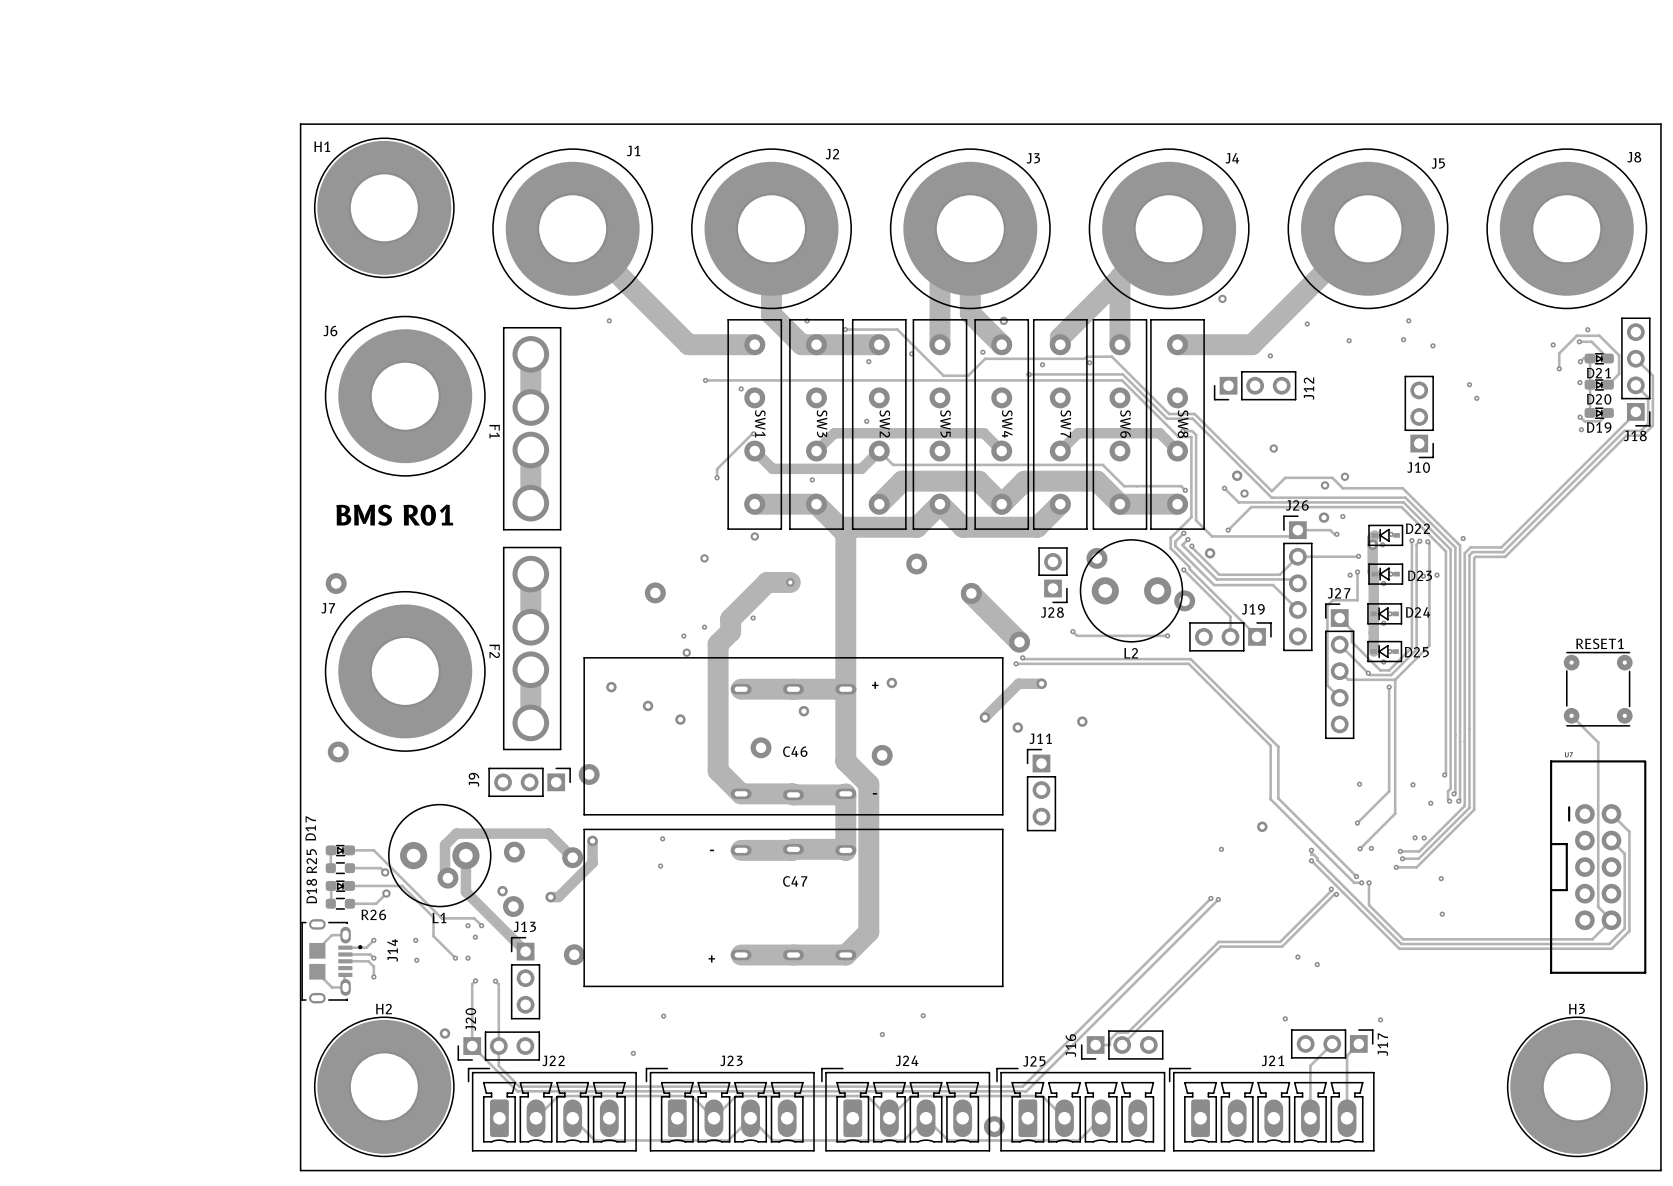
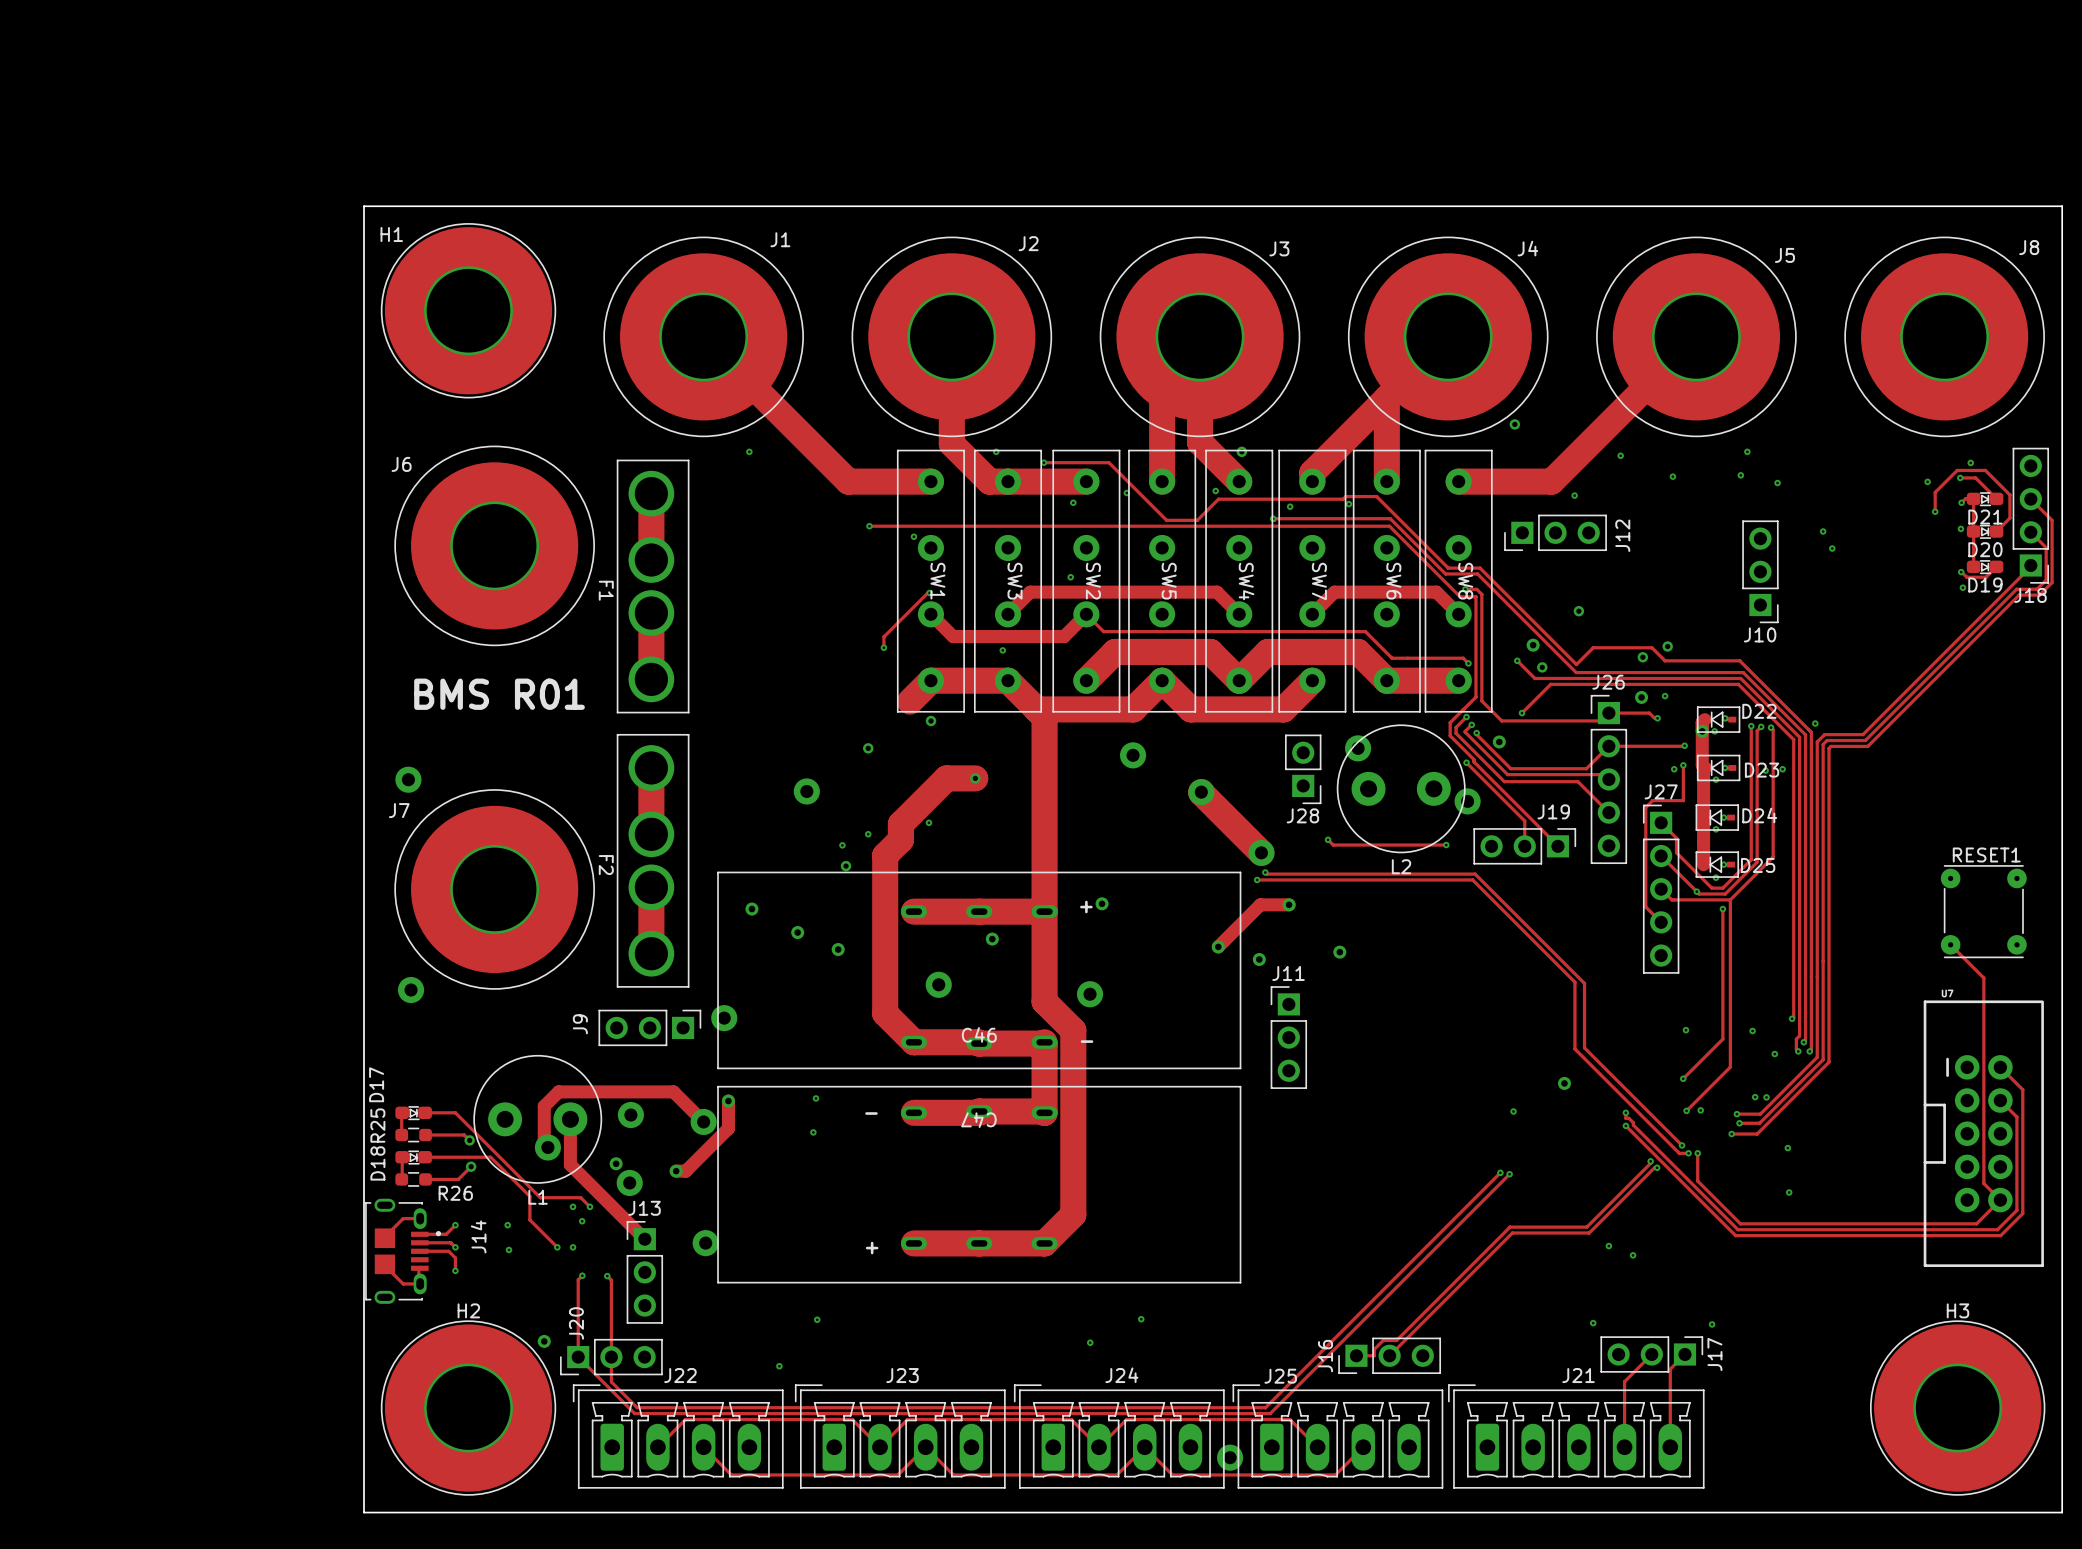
track: none -> (930, 680) (910, 701)
C46 name position: C46 (795, 751) -> C46 (979, 1034)
C47 name rotation: 0° (795, 881) -> 180° (978, 1120)

